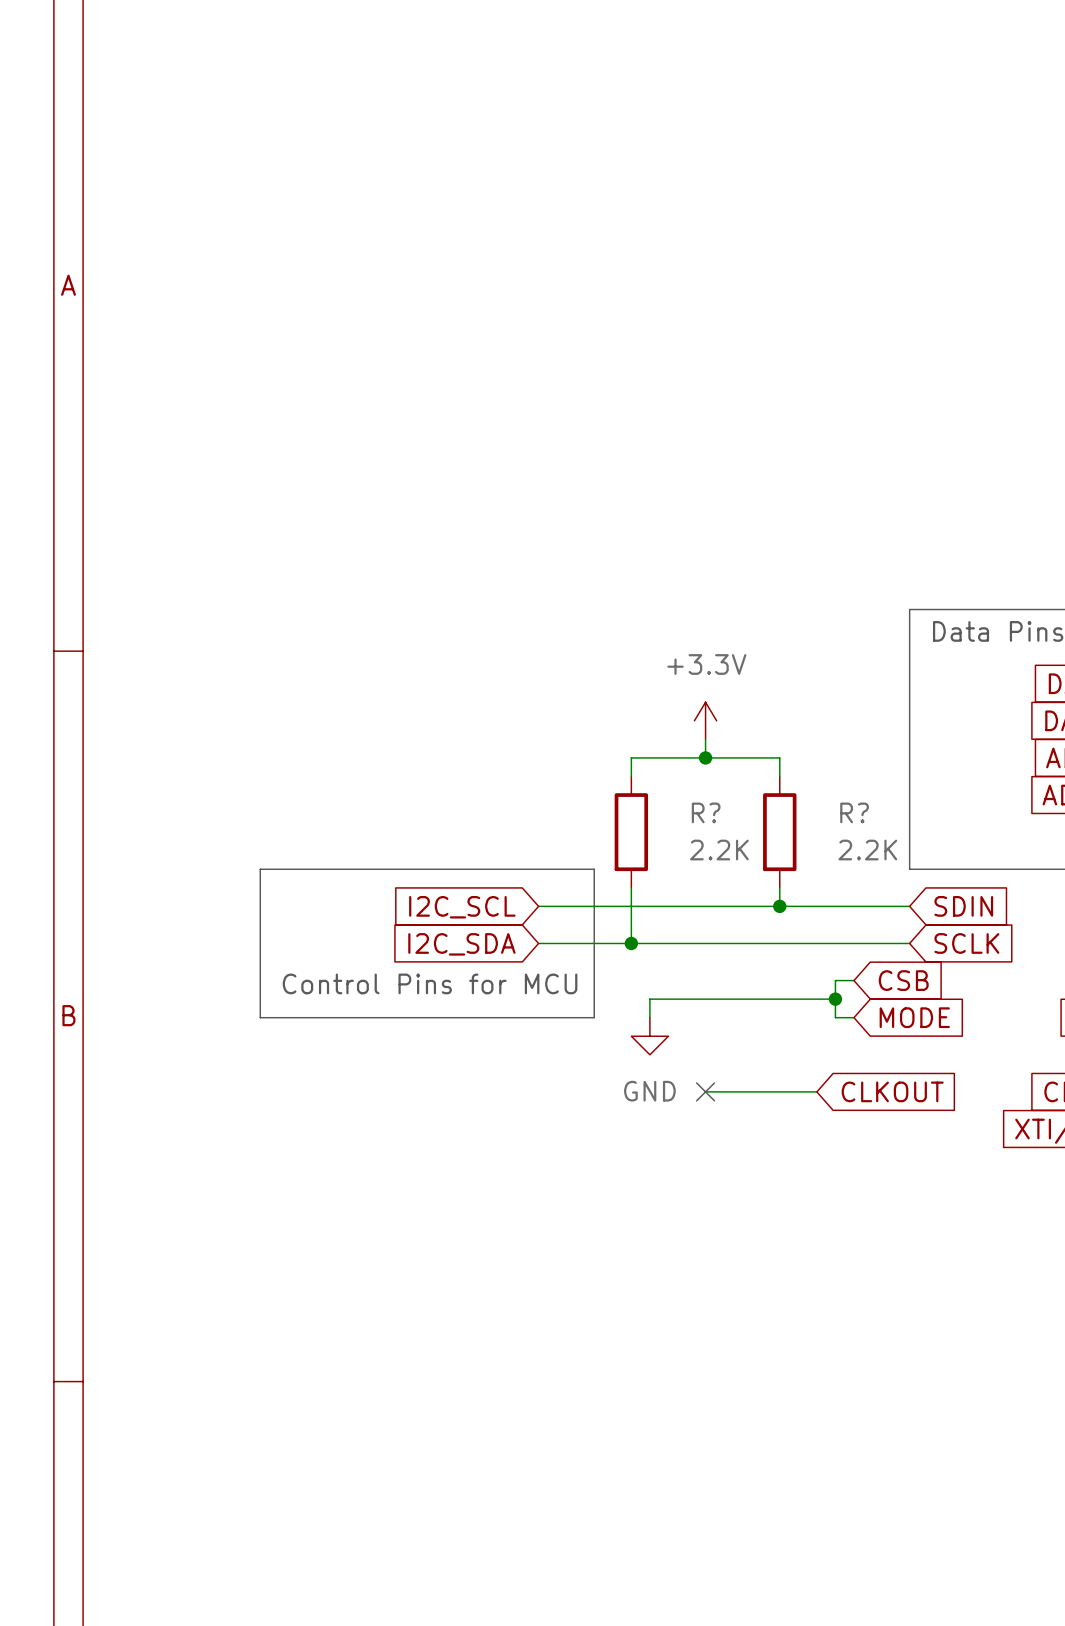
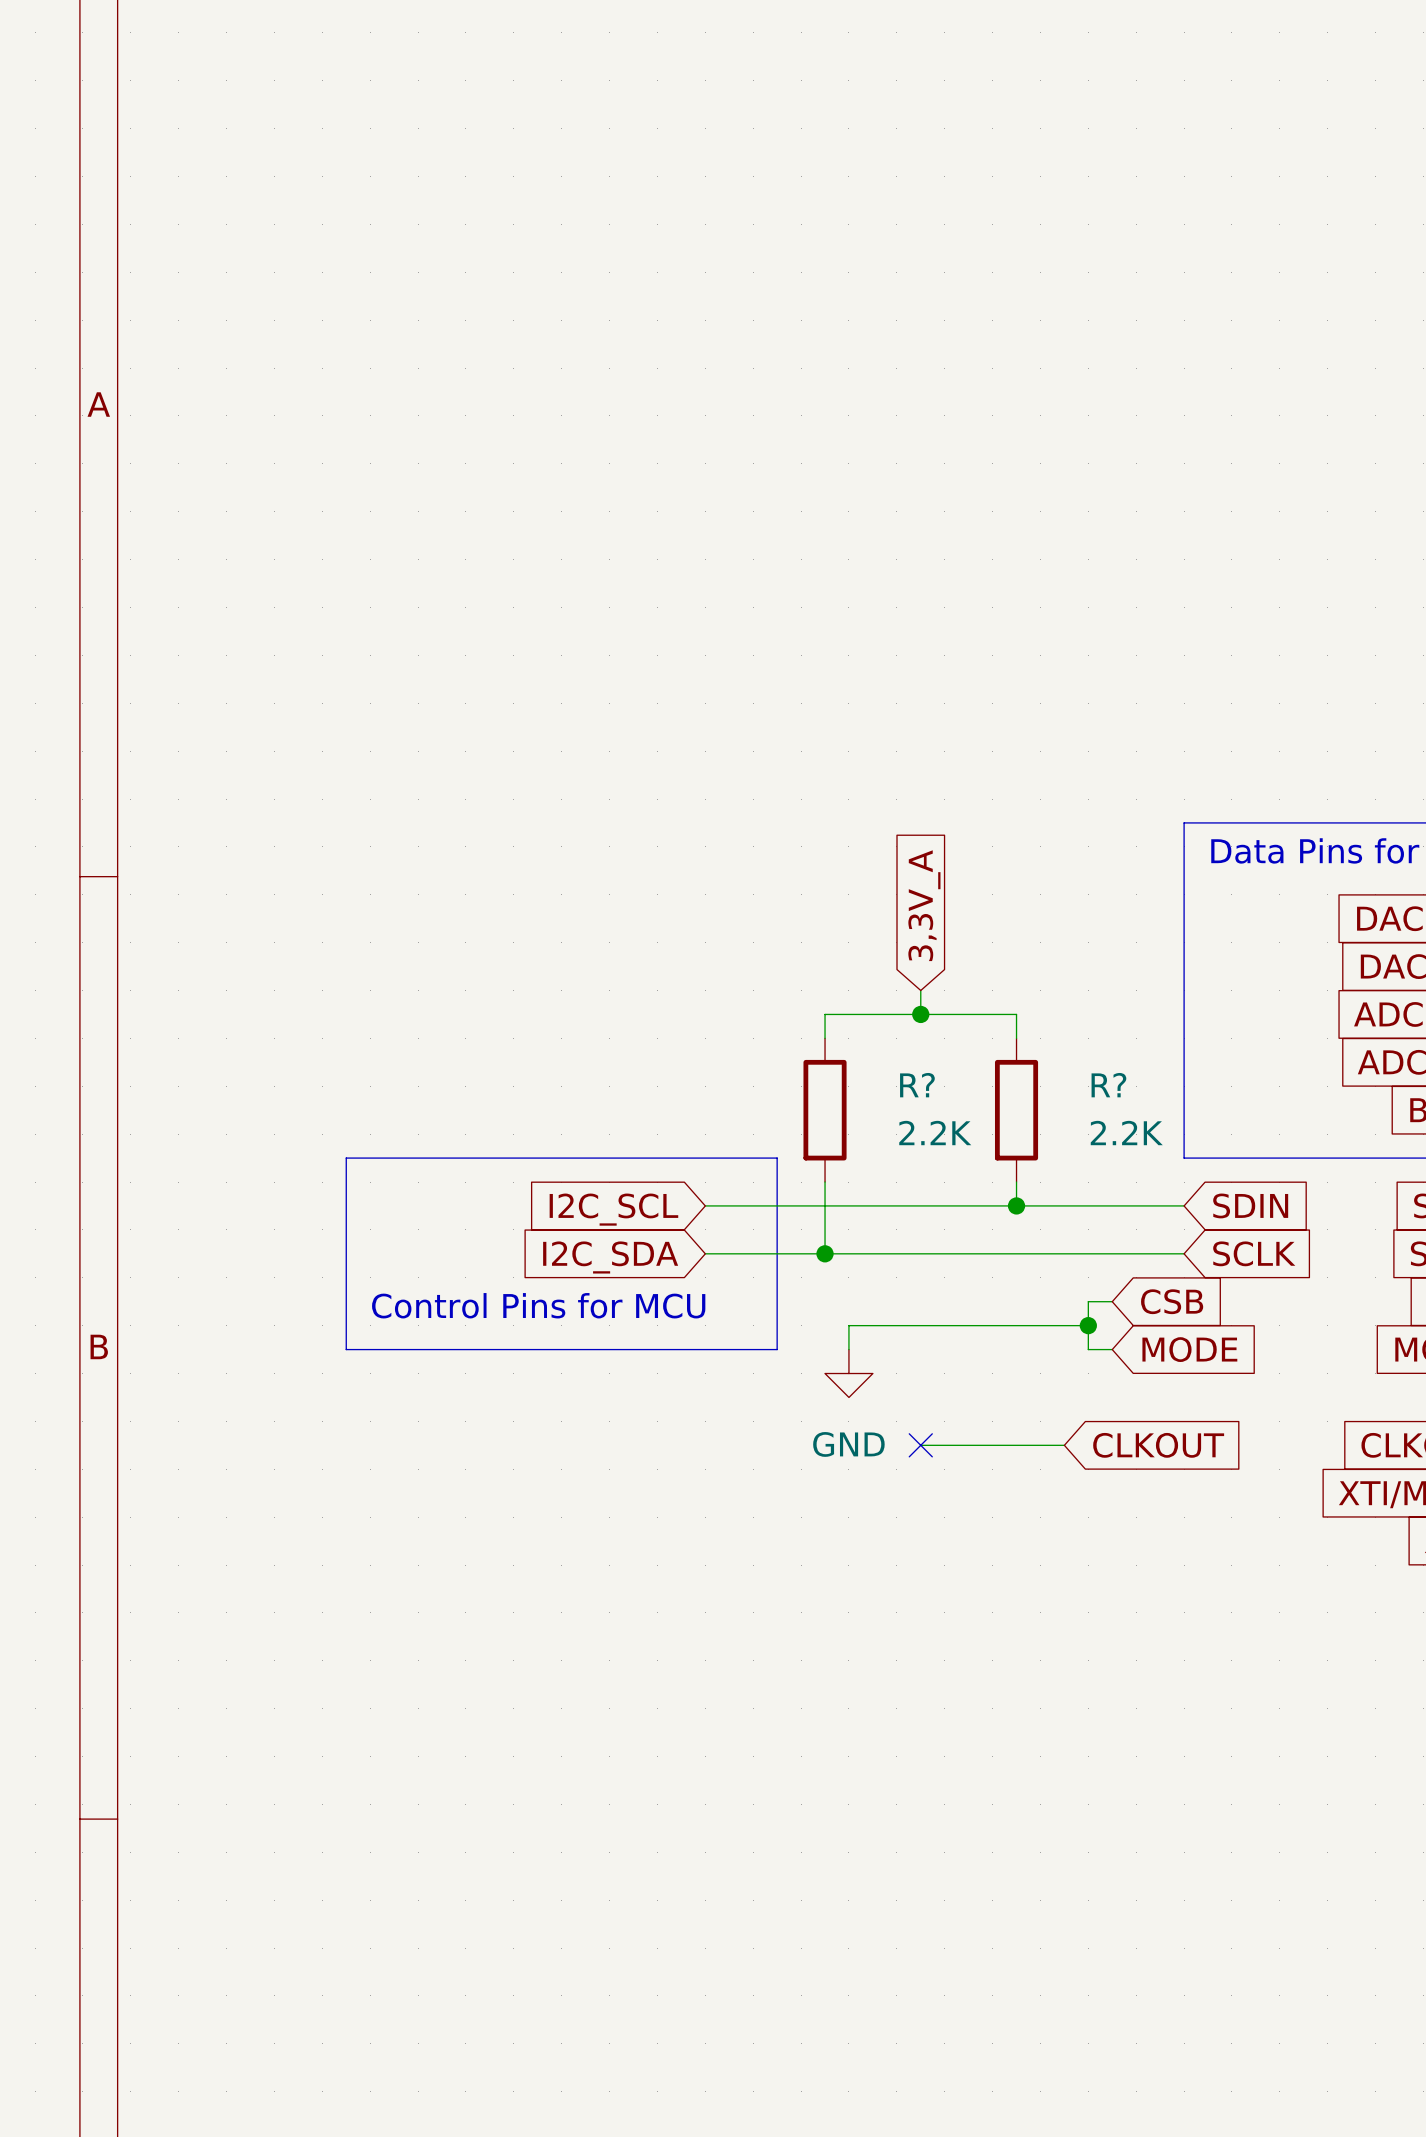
global label: none -> 3,3V_A (924, 905)
power symbol: +3.3V (705, 720) -> none

